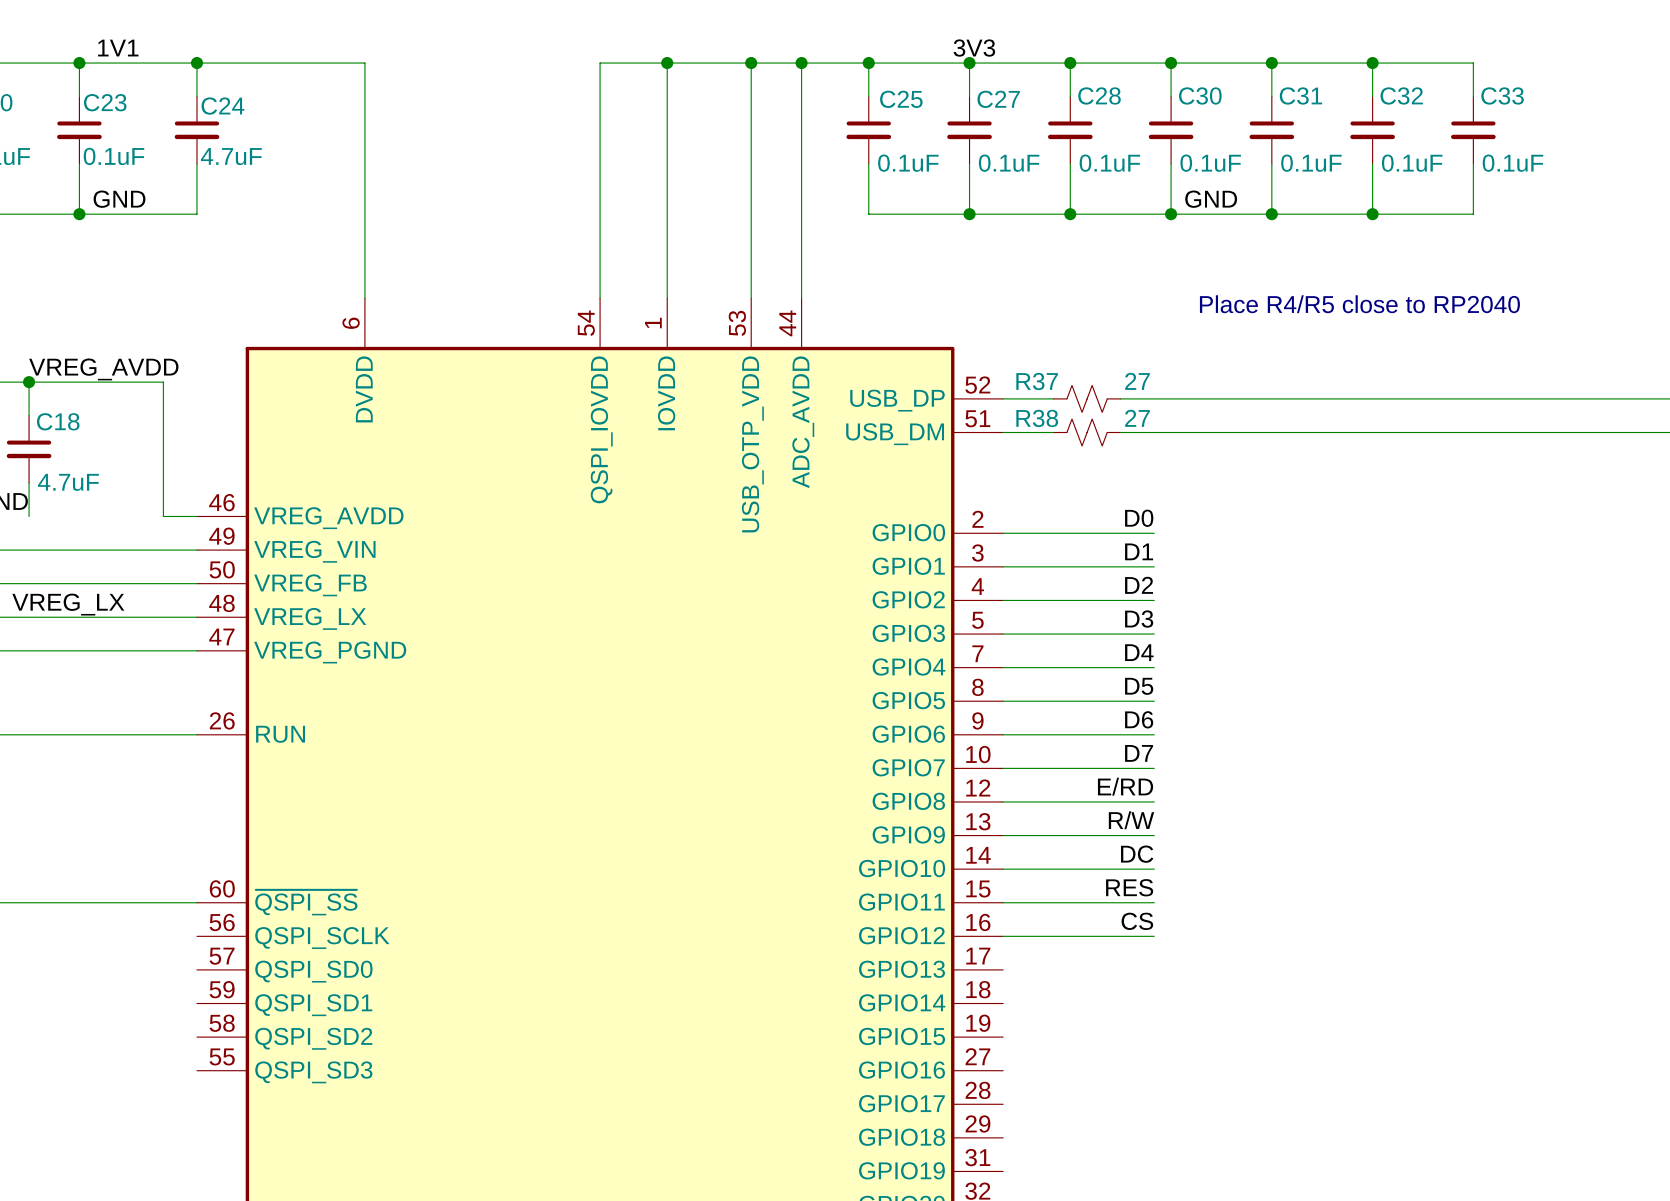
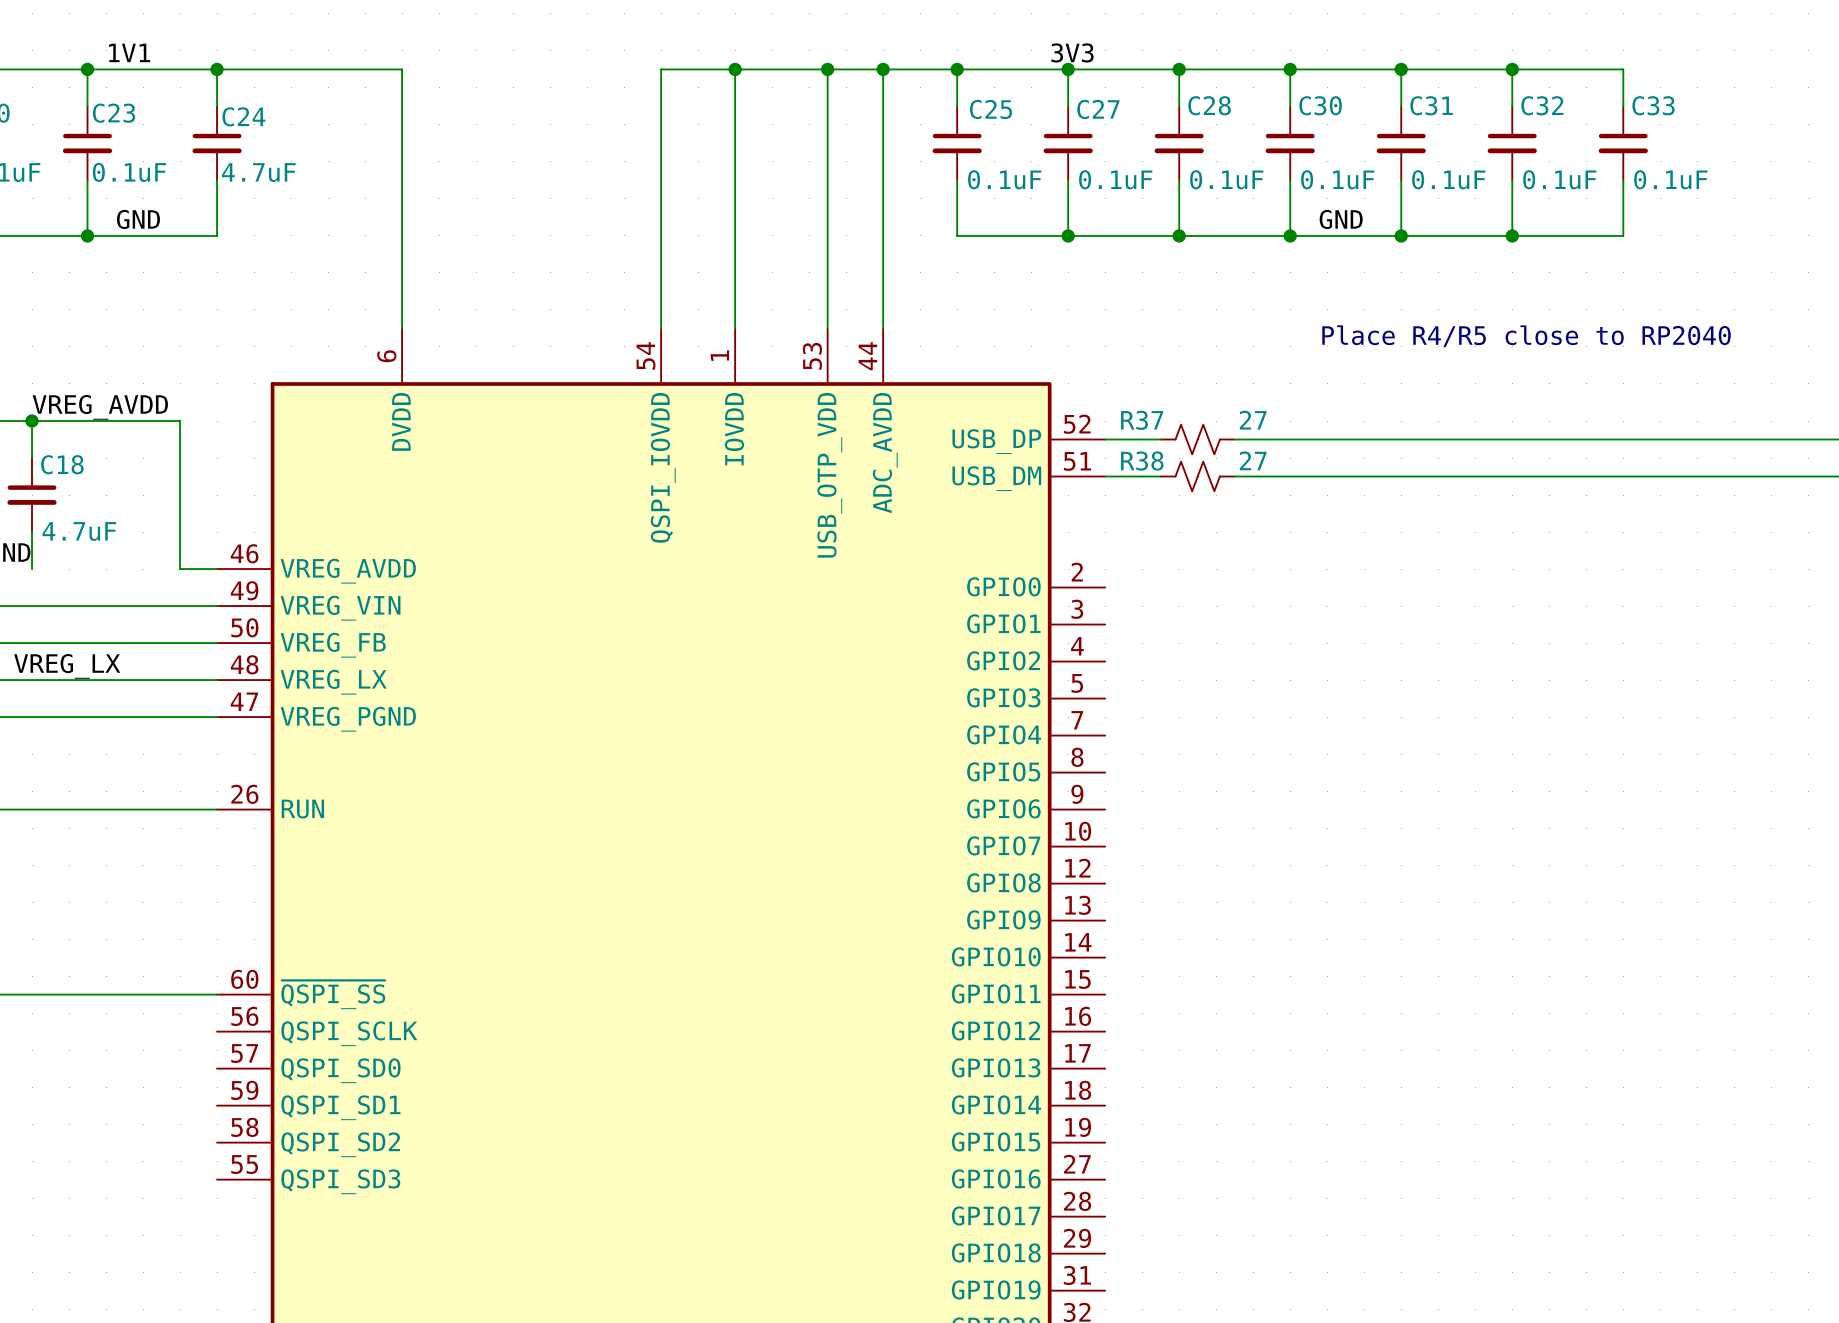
label: D0 (1139, 518) -> none
wire: (1003, 533) (1154, 533) -> none
label: D1 (1139, 551) -> none
wire: (1003, 566) (1154, 566) -> none
label: D2 (1139, 585) -> none
wire: (1003, 600) (1154, 600) -> none
label: D3 (1139, 619) -> none
wire: (1003, 634) (1154, 634) -> none
label: D4 (1139, 652) -> none
wire: (1003, 667) (1154, 667) -> none
label: D5 (1139, 686) -> none
wire: (1003, 701) (1154, 701) -> none
label: D6 (1139, 719) -> none
wire: (1003, 734) (1154, 734) -> none
label: D7 (1139, 753) -> none
wire: (1003, 768) (1154, 768) -> none
label: E/RD (1125, 786) -> none
wire: (1003, 801) (1154, 801) -> none
label: R/W (1131, 820) -> none
wire: (1003, 835) (1154, 835) -> none
label: DC (1137, 854) -> none
wire: (1003, 869) (1154, 869) -> none
label: RES (1129, 887) -> none
wire: (1003, 902) (1154, 902) -> none
label: CS (1137, 921) -> none
wire: (1003, 936) (1154, 936) -> none

